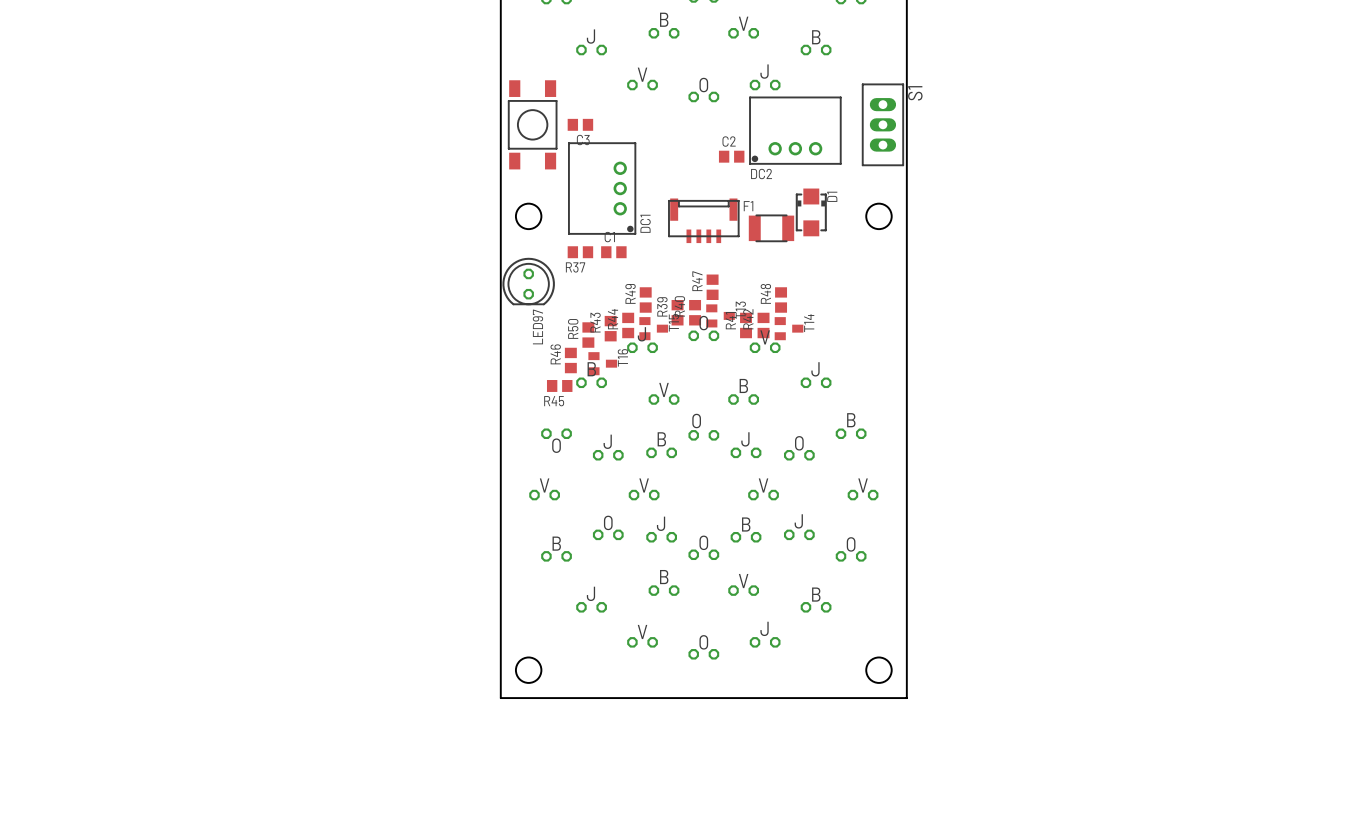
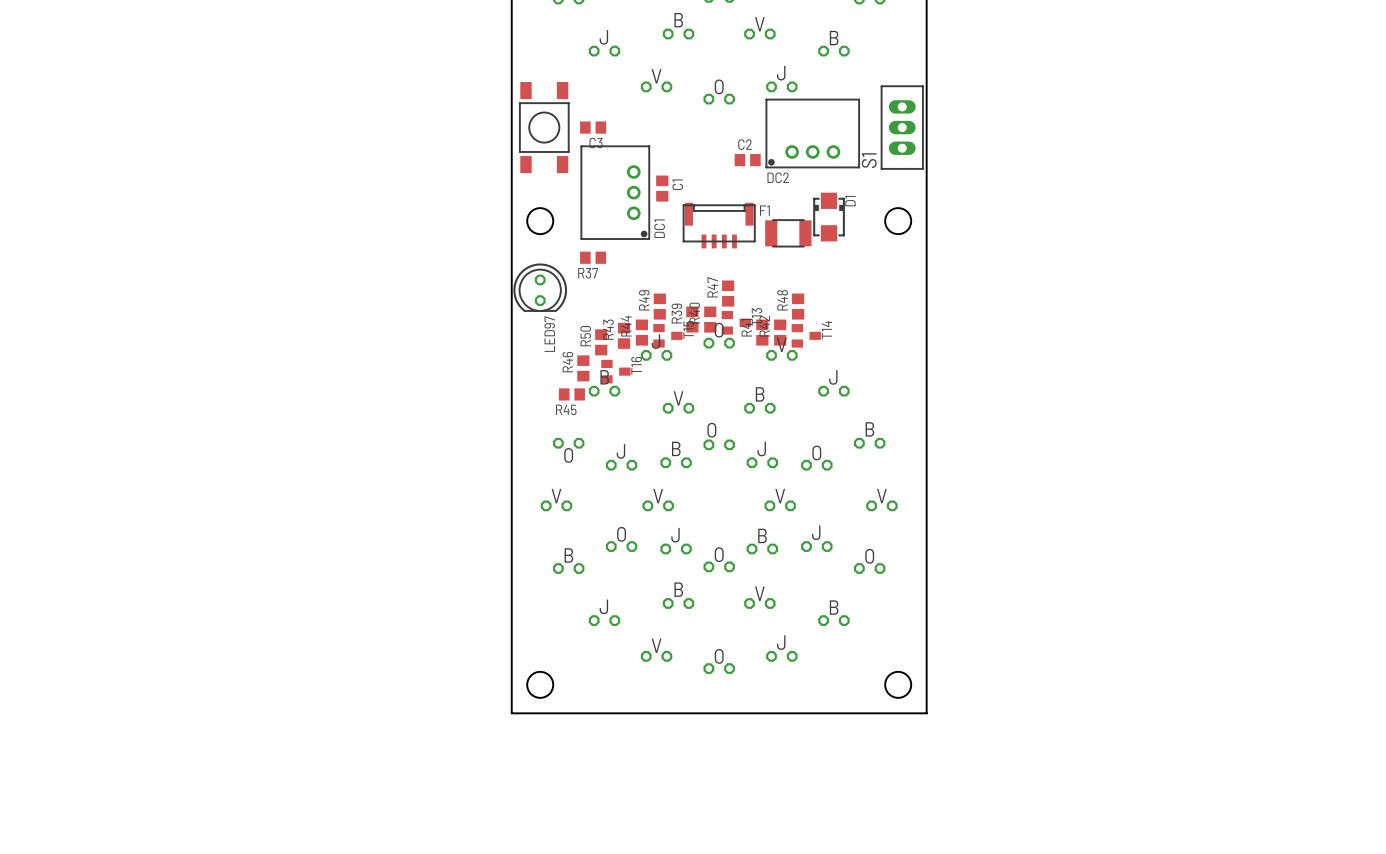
S1 name position: S1 (915, 93) -> S1 (869, 160)
C1 rotation: 0° (613, 252) -> 90° clockwise (662, 188)
C1 position: (613, 252) -> (662, 188)

